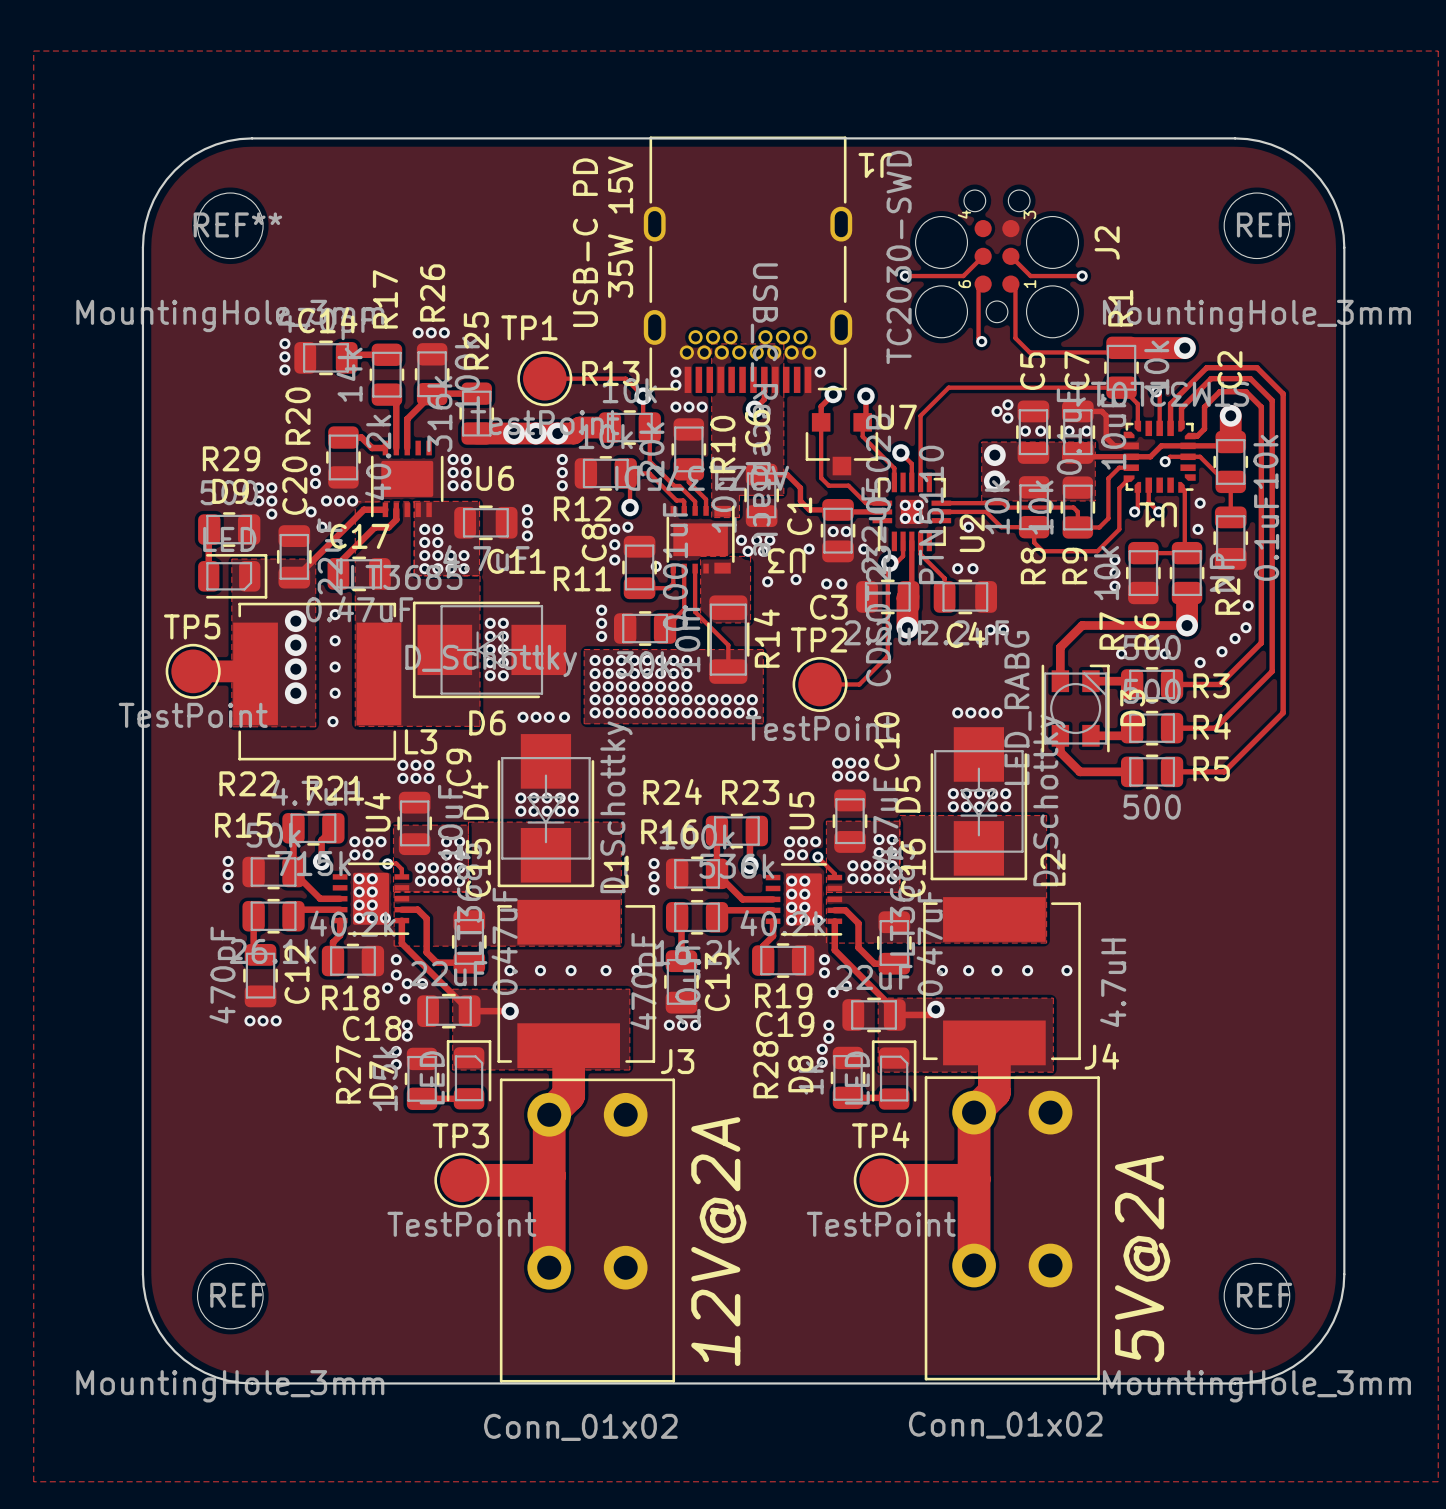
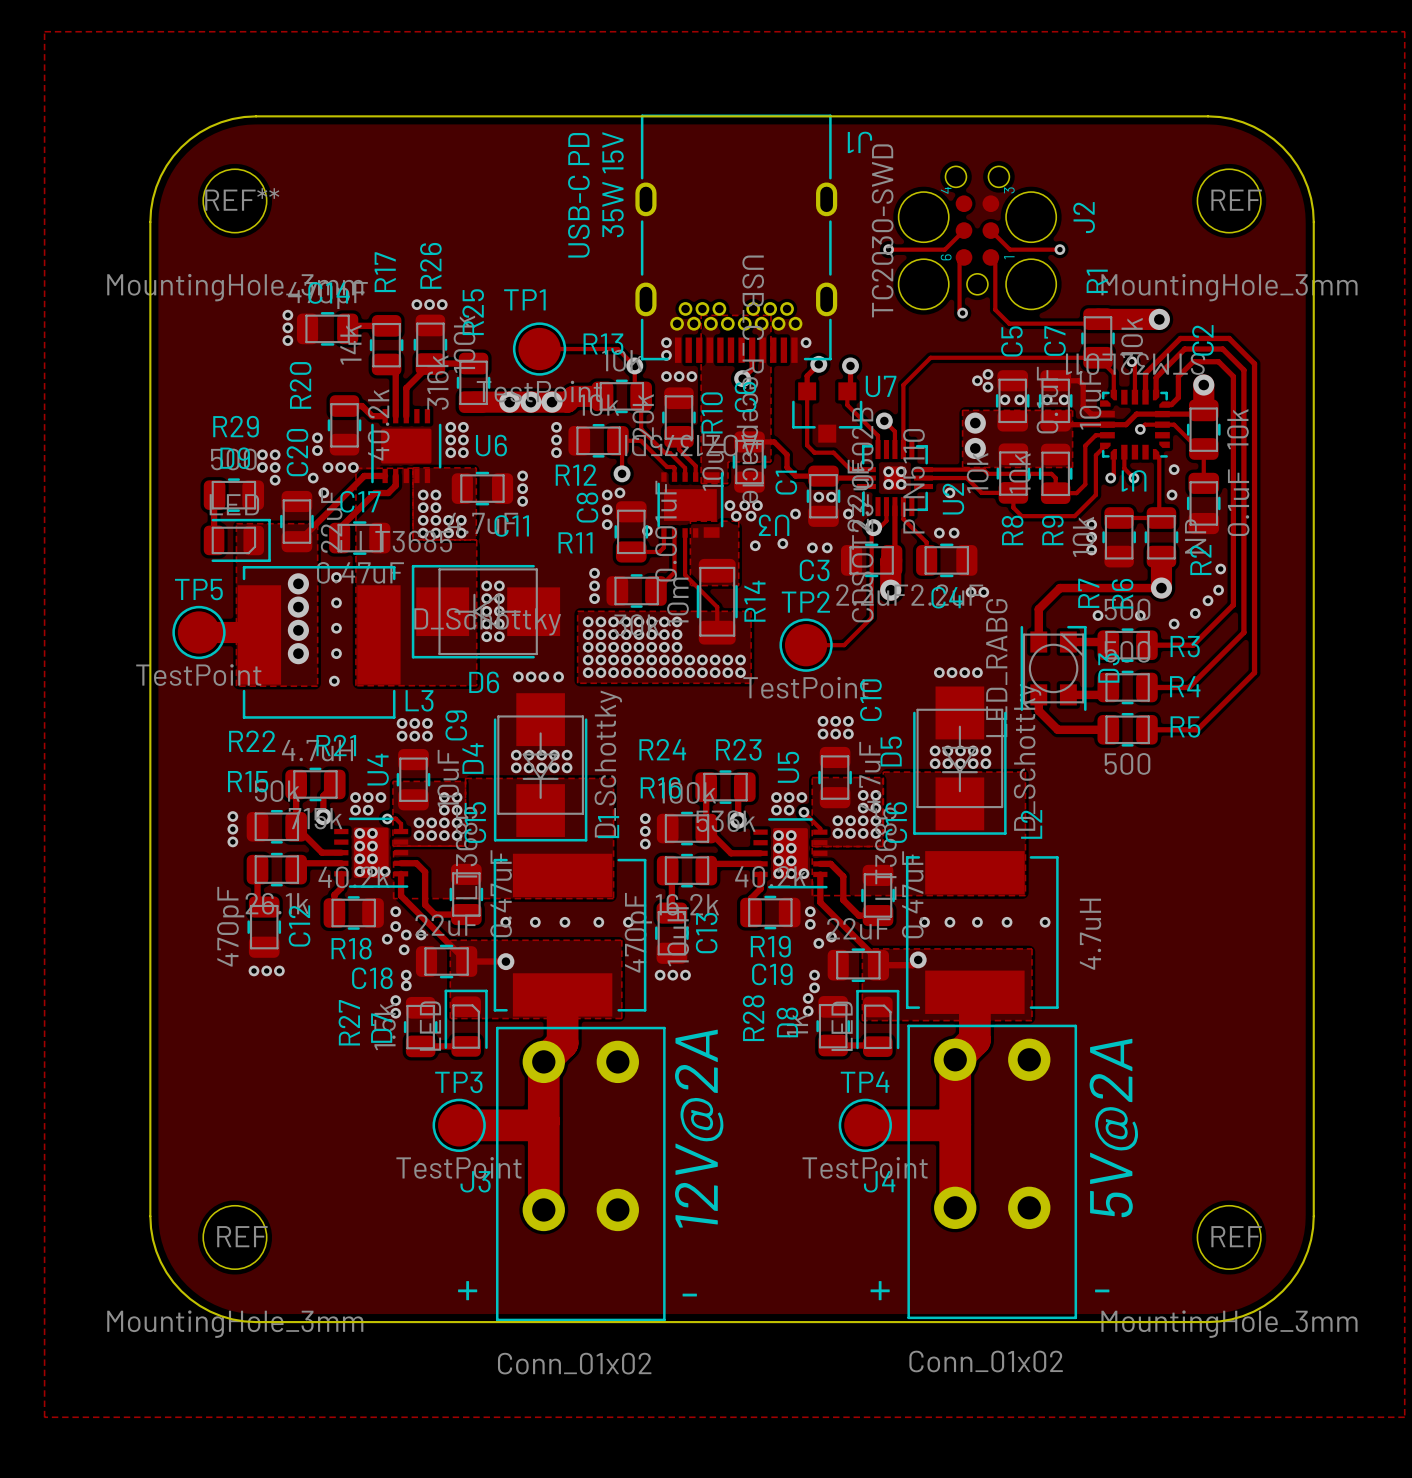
J4 name position: J4 (1101, 1056) -> J4 (879, 1181)
J3 name position: J3 (677, 1061) -> J3 (475, 1181)
text position: 12V@2A (718, 1241) -> 12V@2A (699, 1128)
text position: 5V@2A (1142, 1258) -> 5V@2A (1113, 1128)
text: none -> + (467, 1290)
text: none -> - (689, 1295)
text: none -> + (880, 1290)
text: none -> - (1102, 1290)

